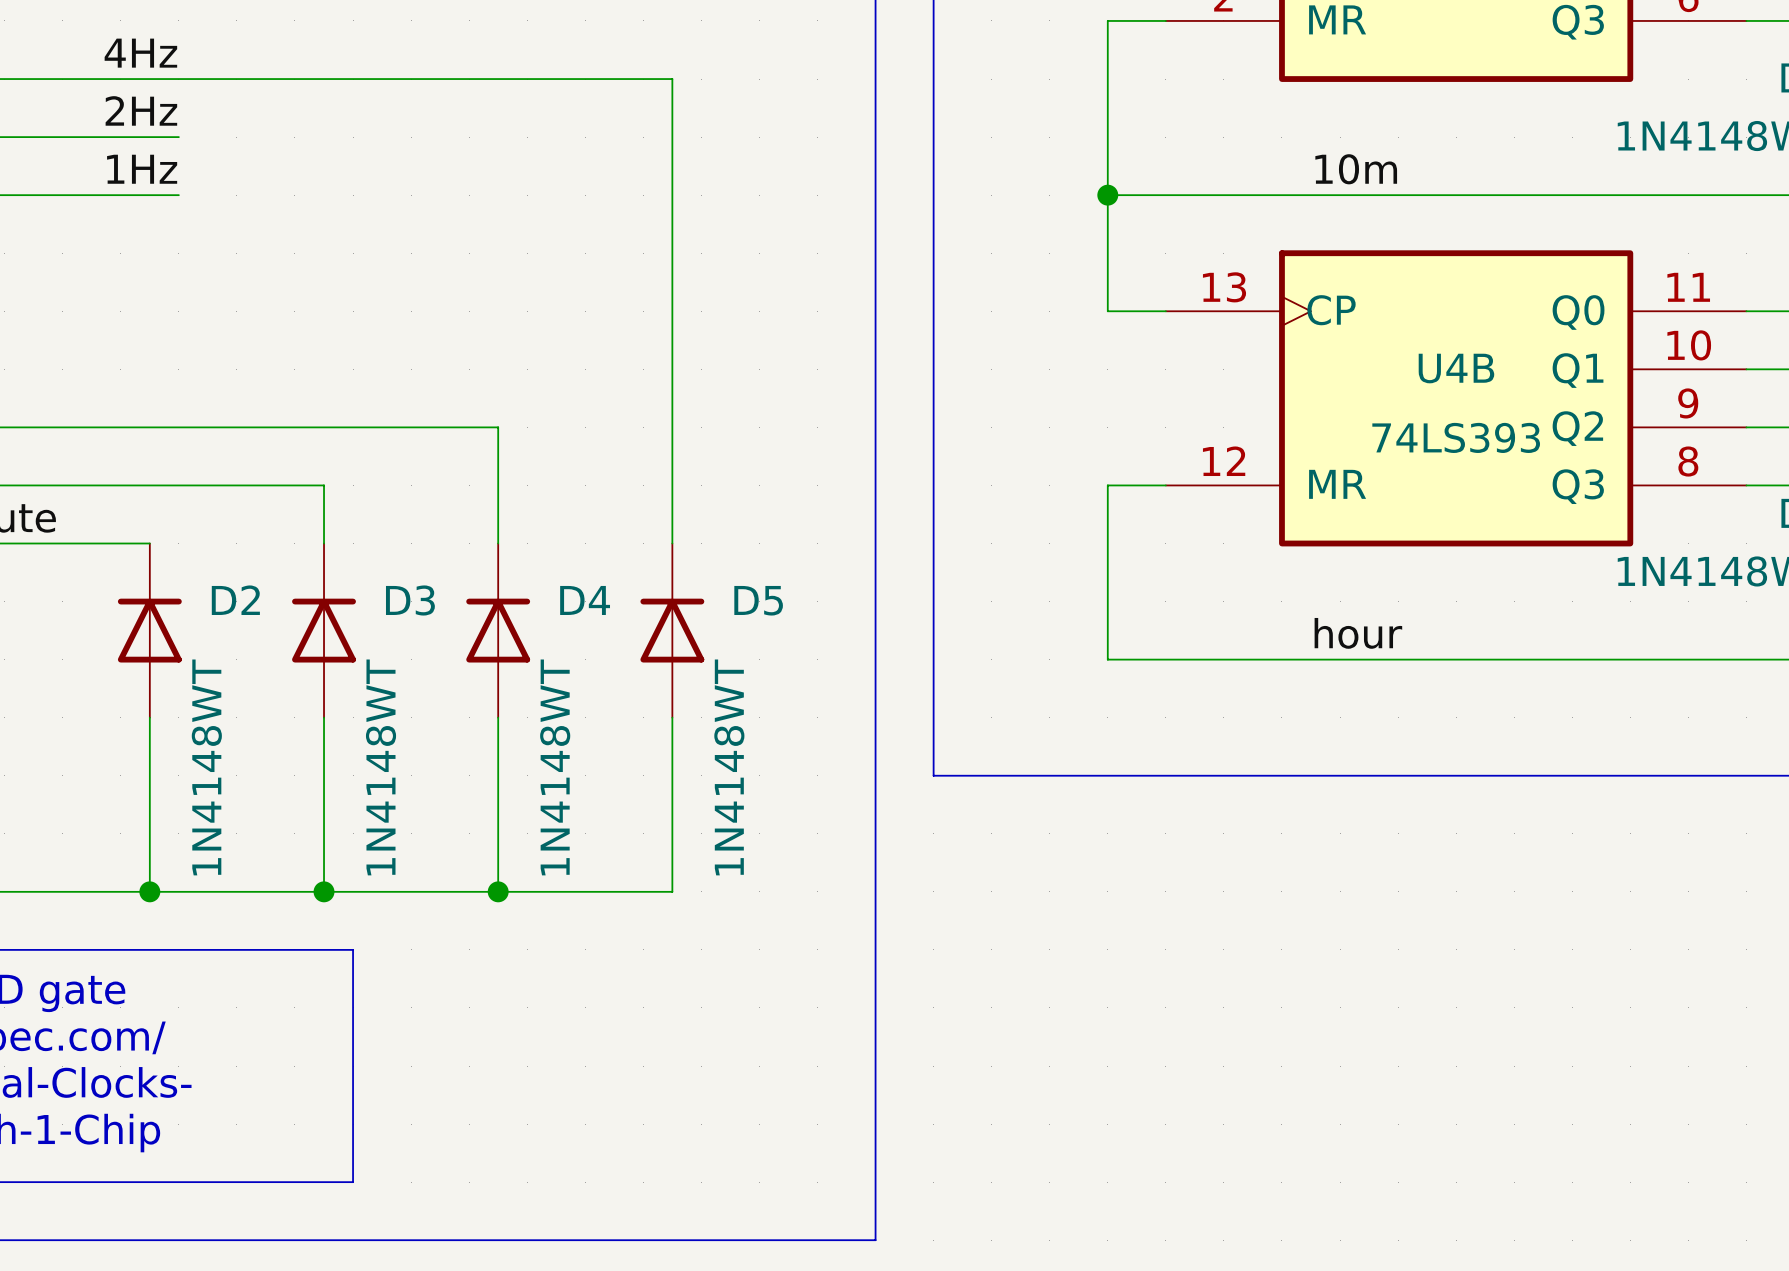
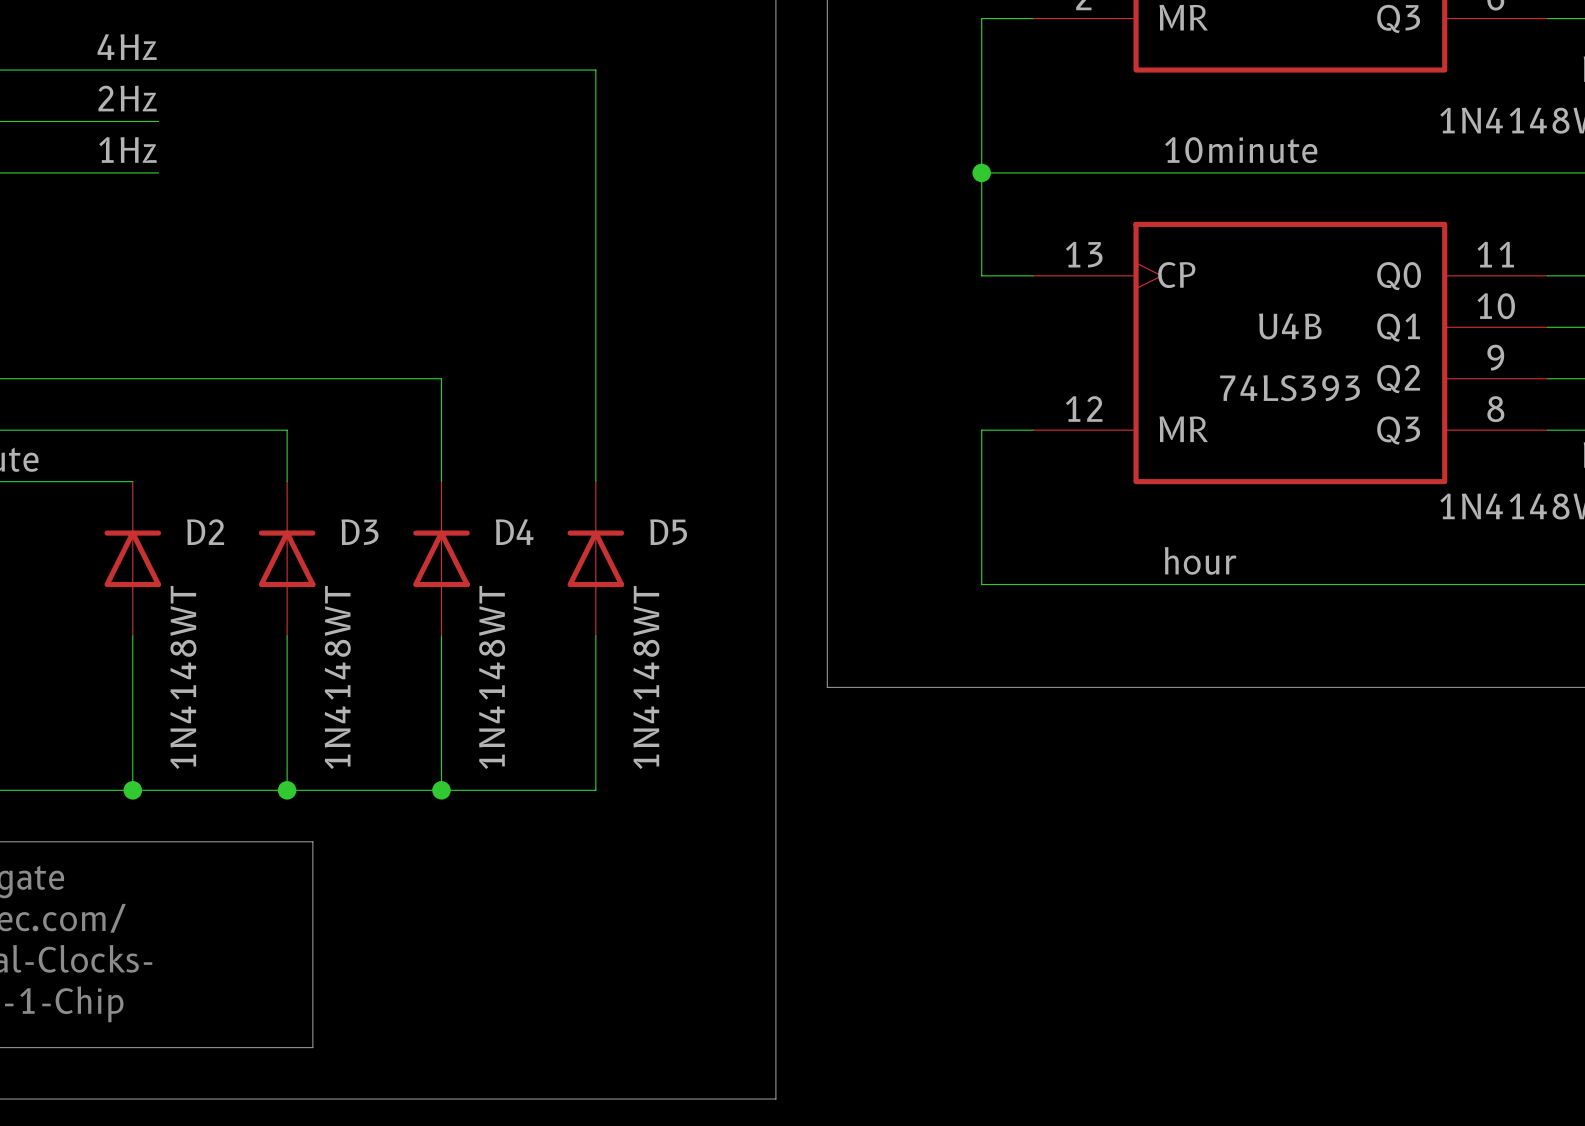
label: 10m (1356, 169) -> 10minute (1241, 150)

